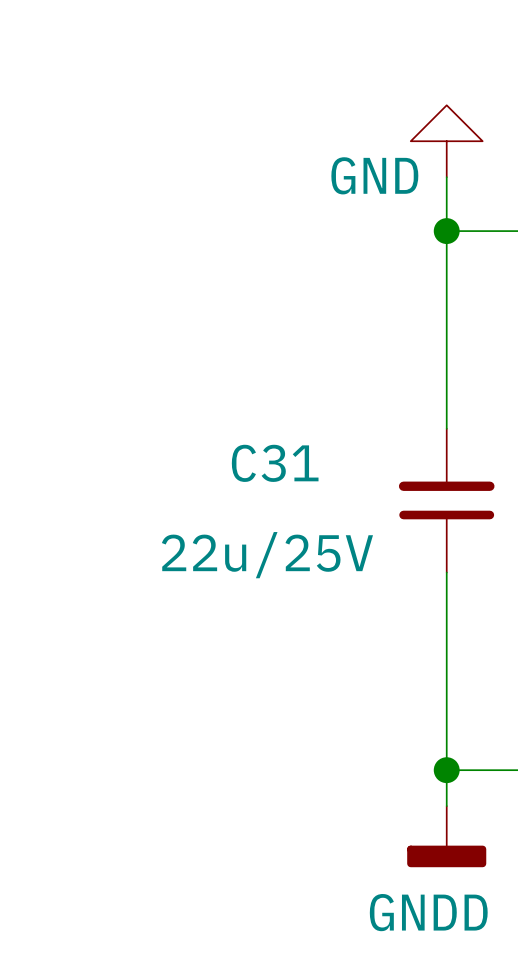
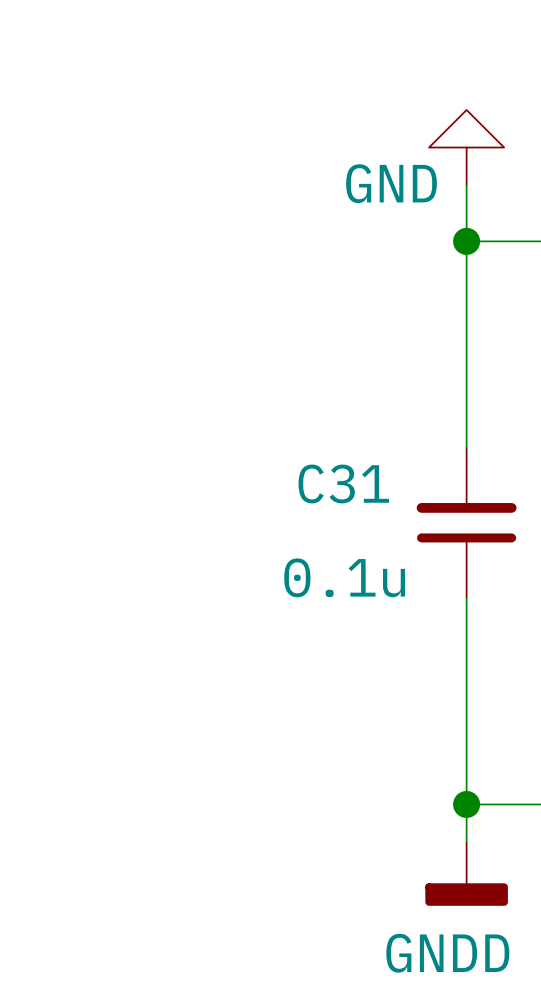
C31 name position: C31 (275, 463) -> C31 (343, 483)
C31 value: 22u/25V (267, 555) -> 0.1u (344, 577)

